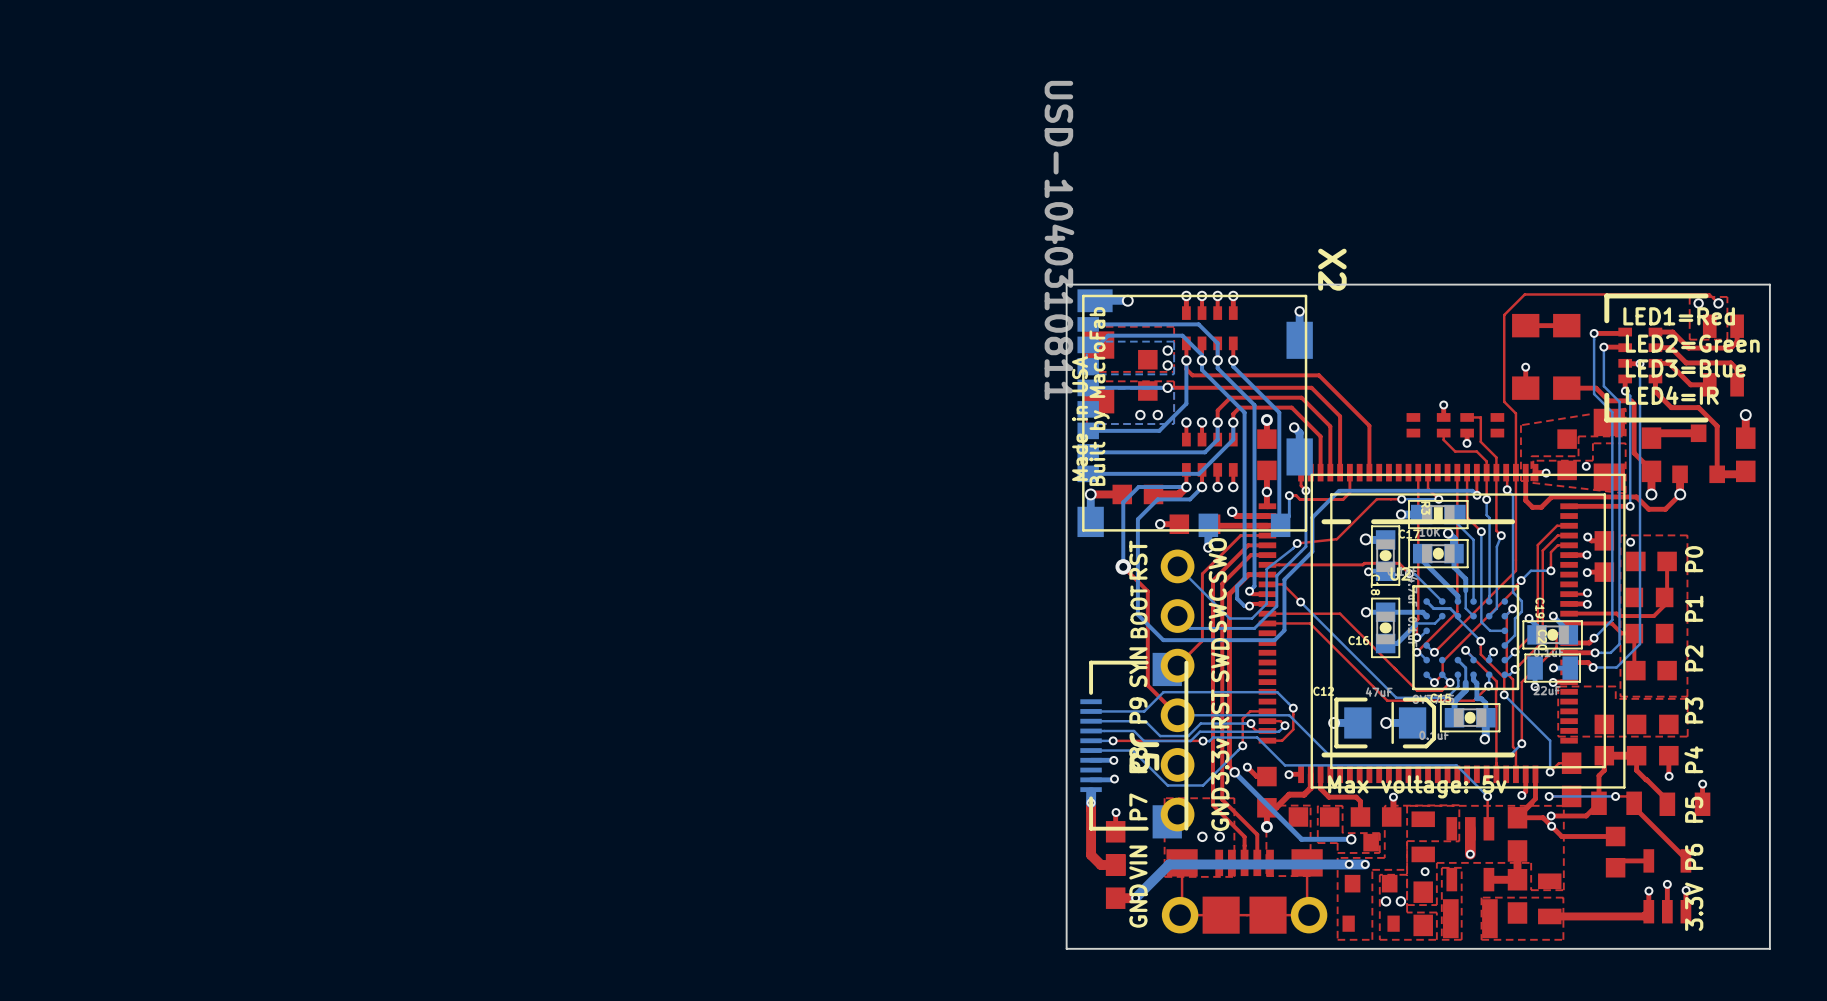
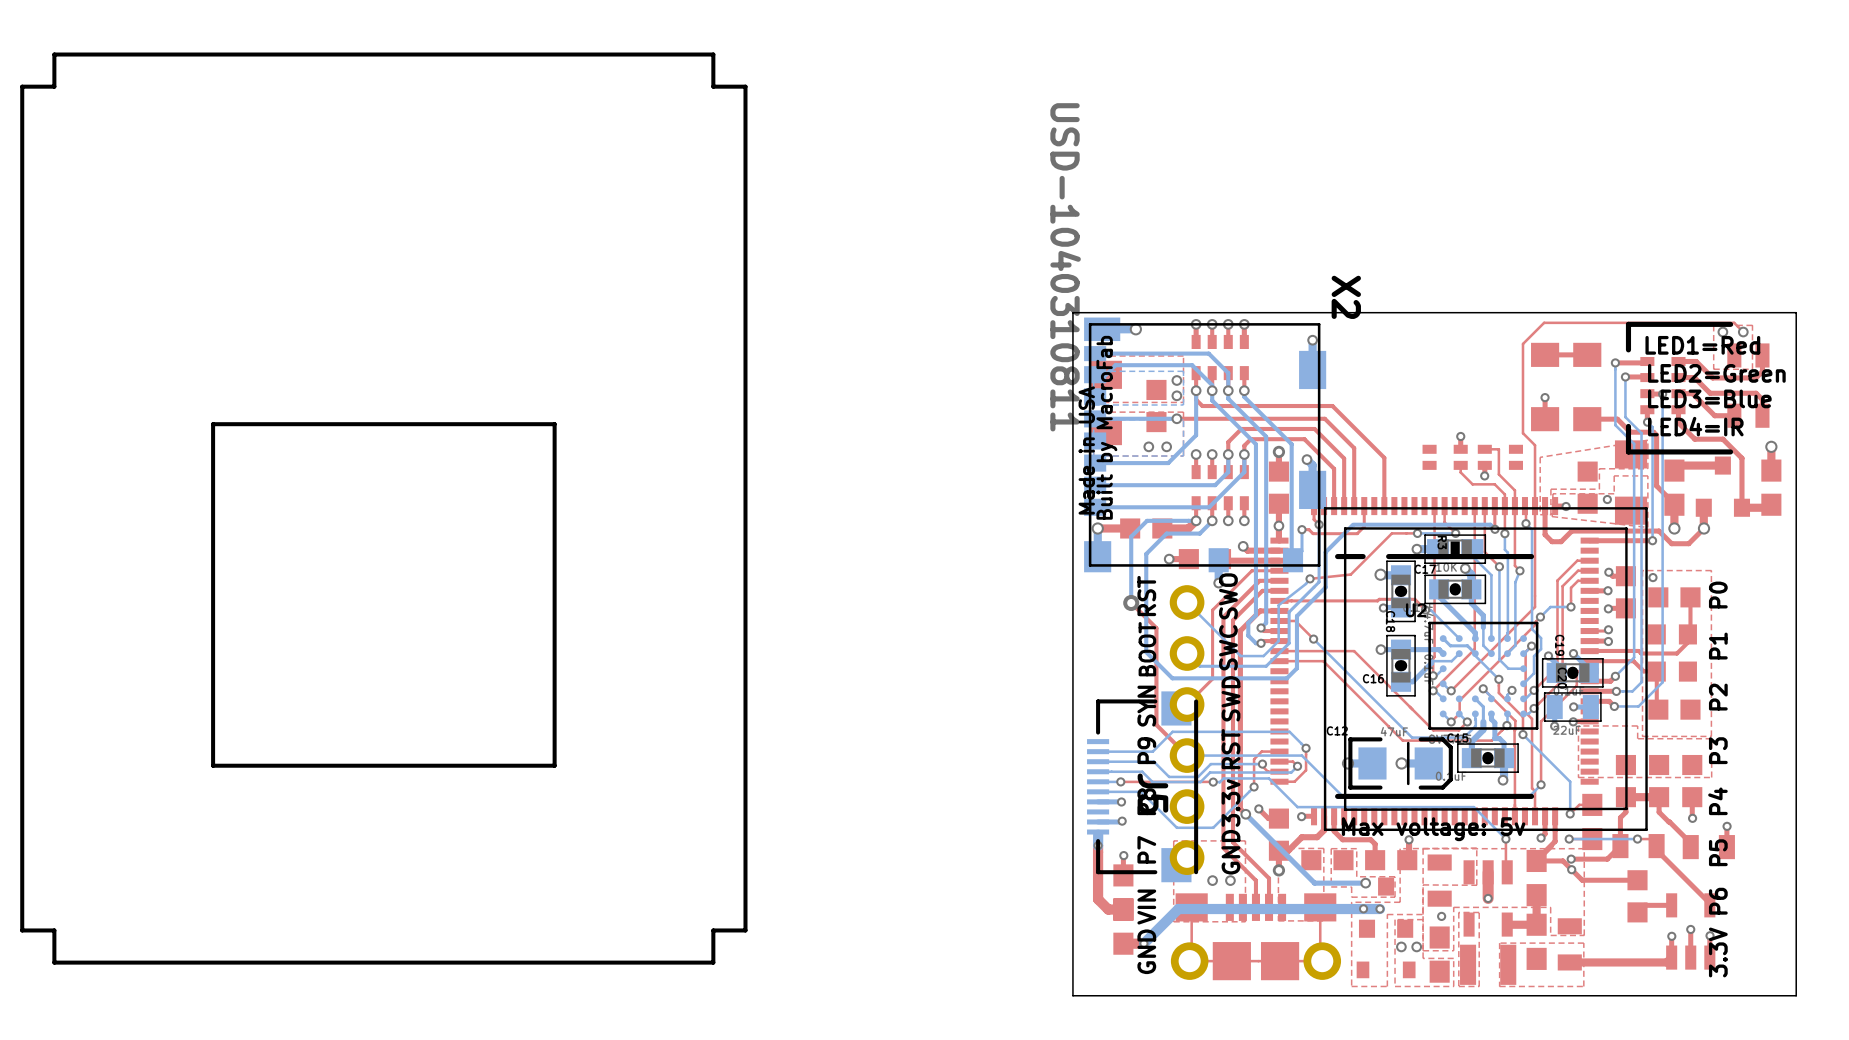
board edge: none -> (713, 54) (713, 86) (745, 86) (745, 930) (713, 930) (713, 962) (54, 962) (54, 930) (22, 930) (22, 86) (54, 86) (54, 54) (713, 54)
board edge: none -> (554, 424) (213, 424) (213, 765) (554, 765) (554, 424)

